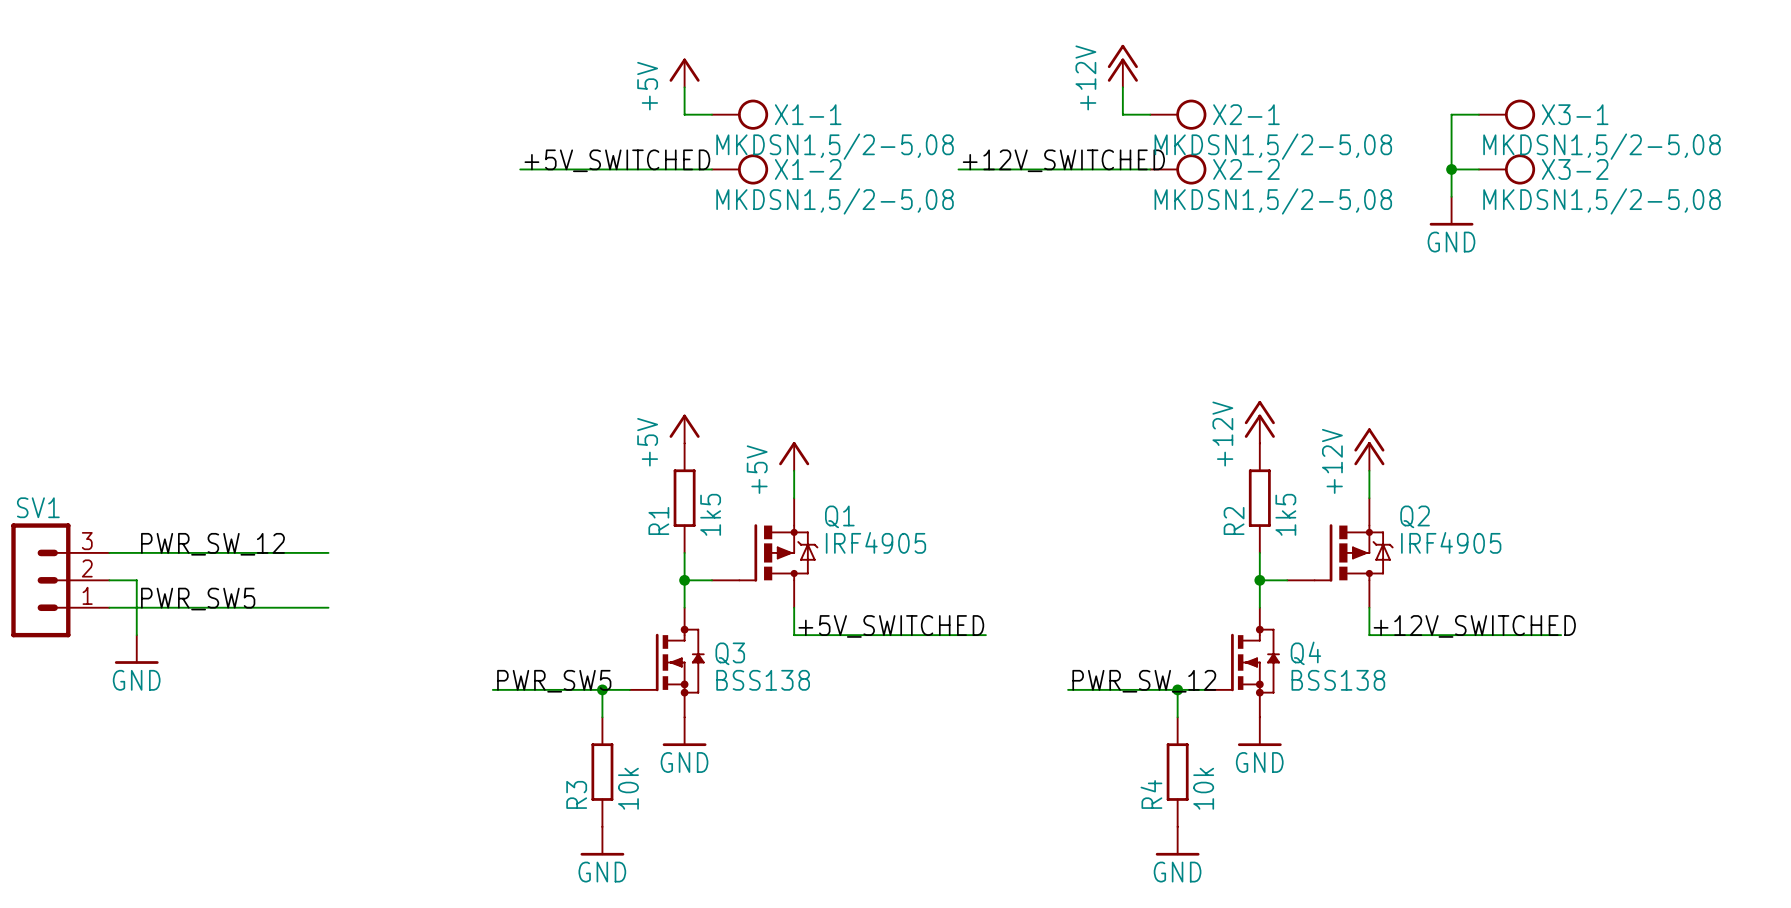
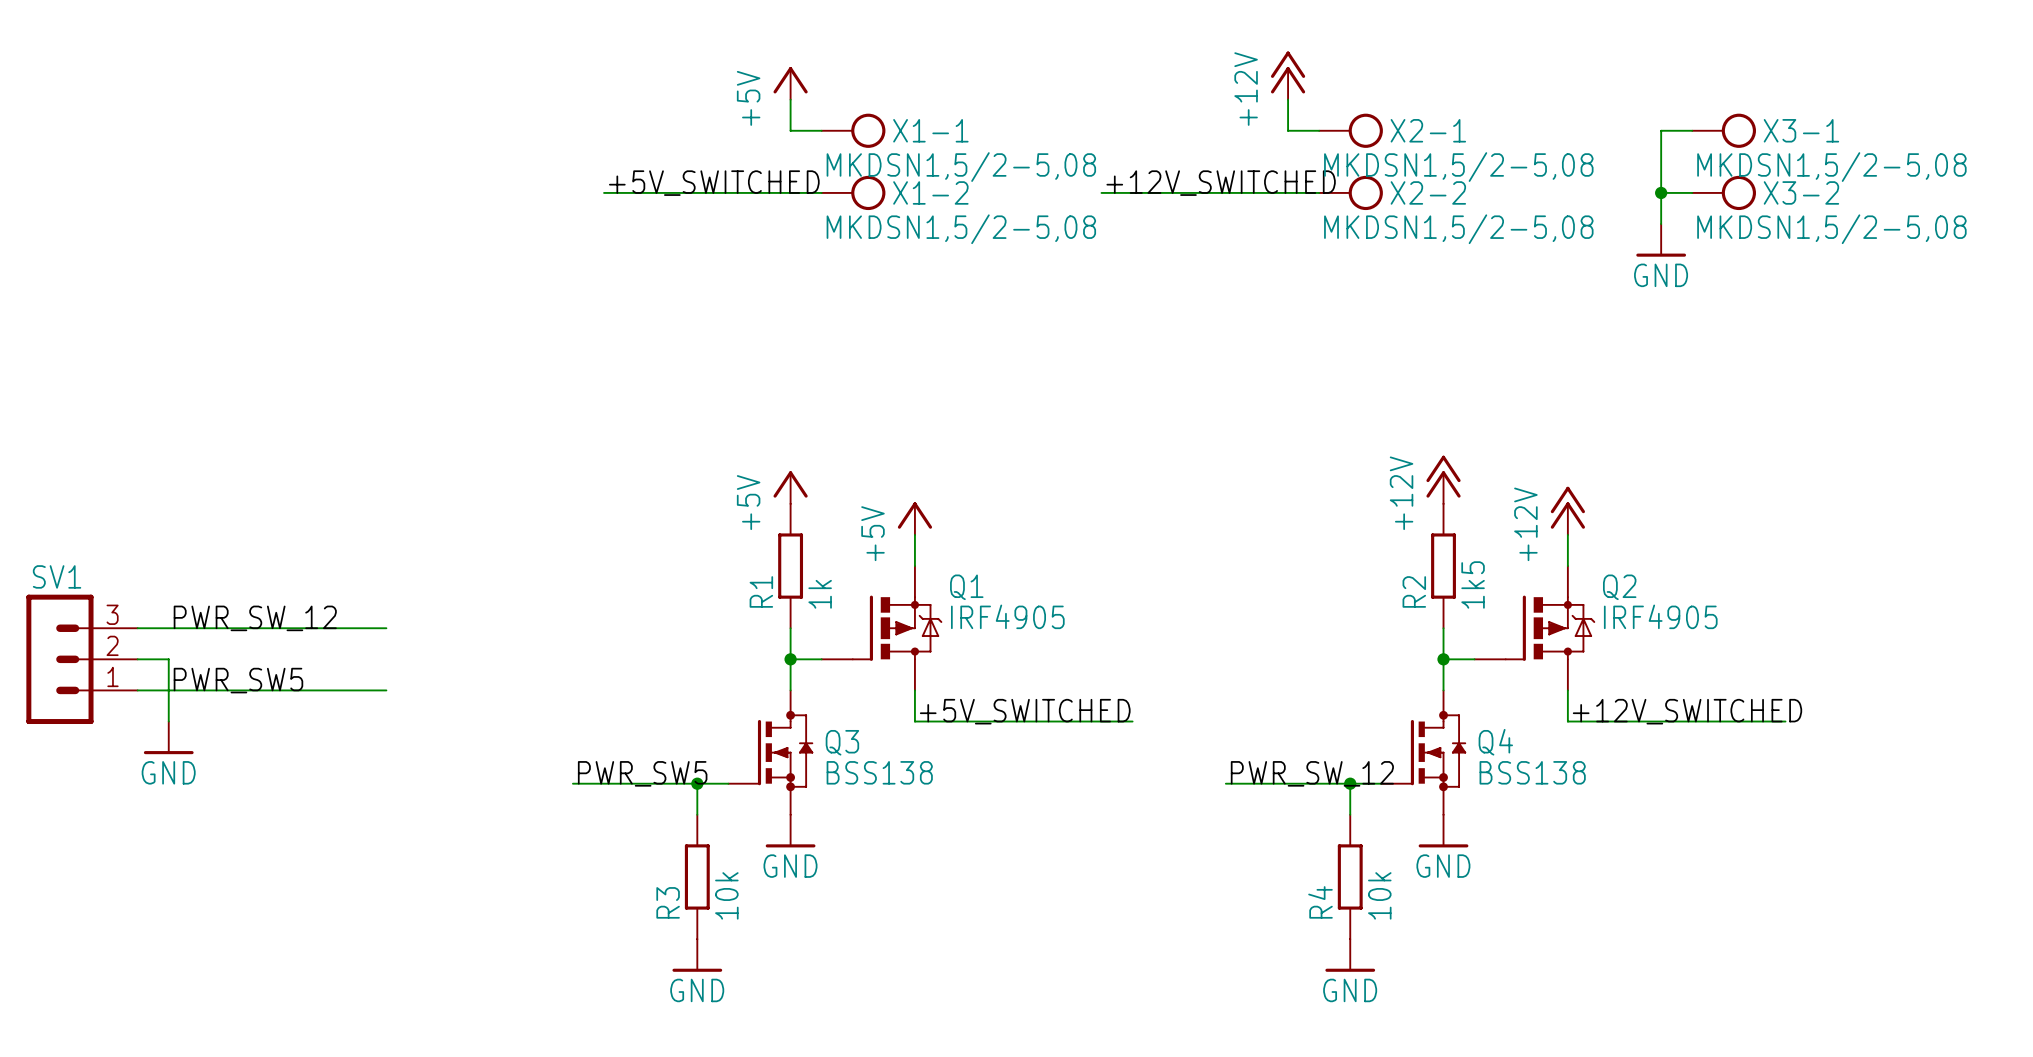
R1 value: 1k5 (710, 514) -> 1k (820, 594)

